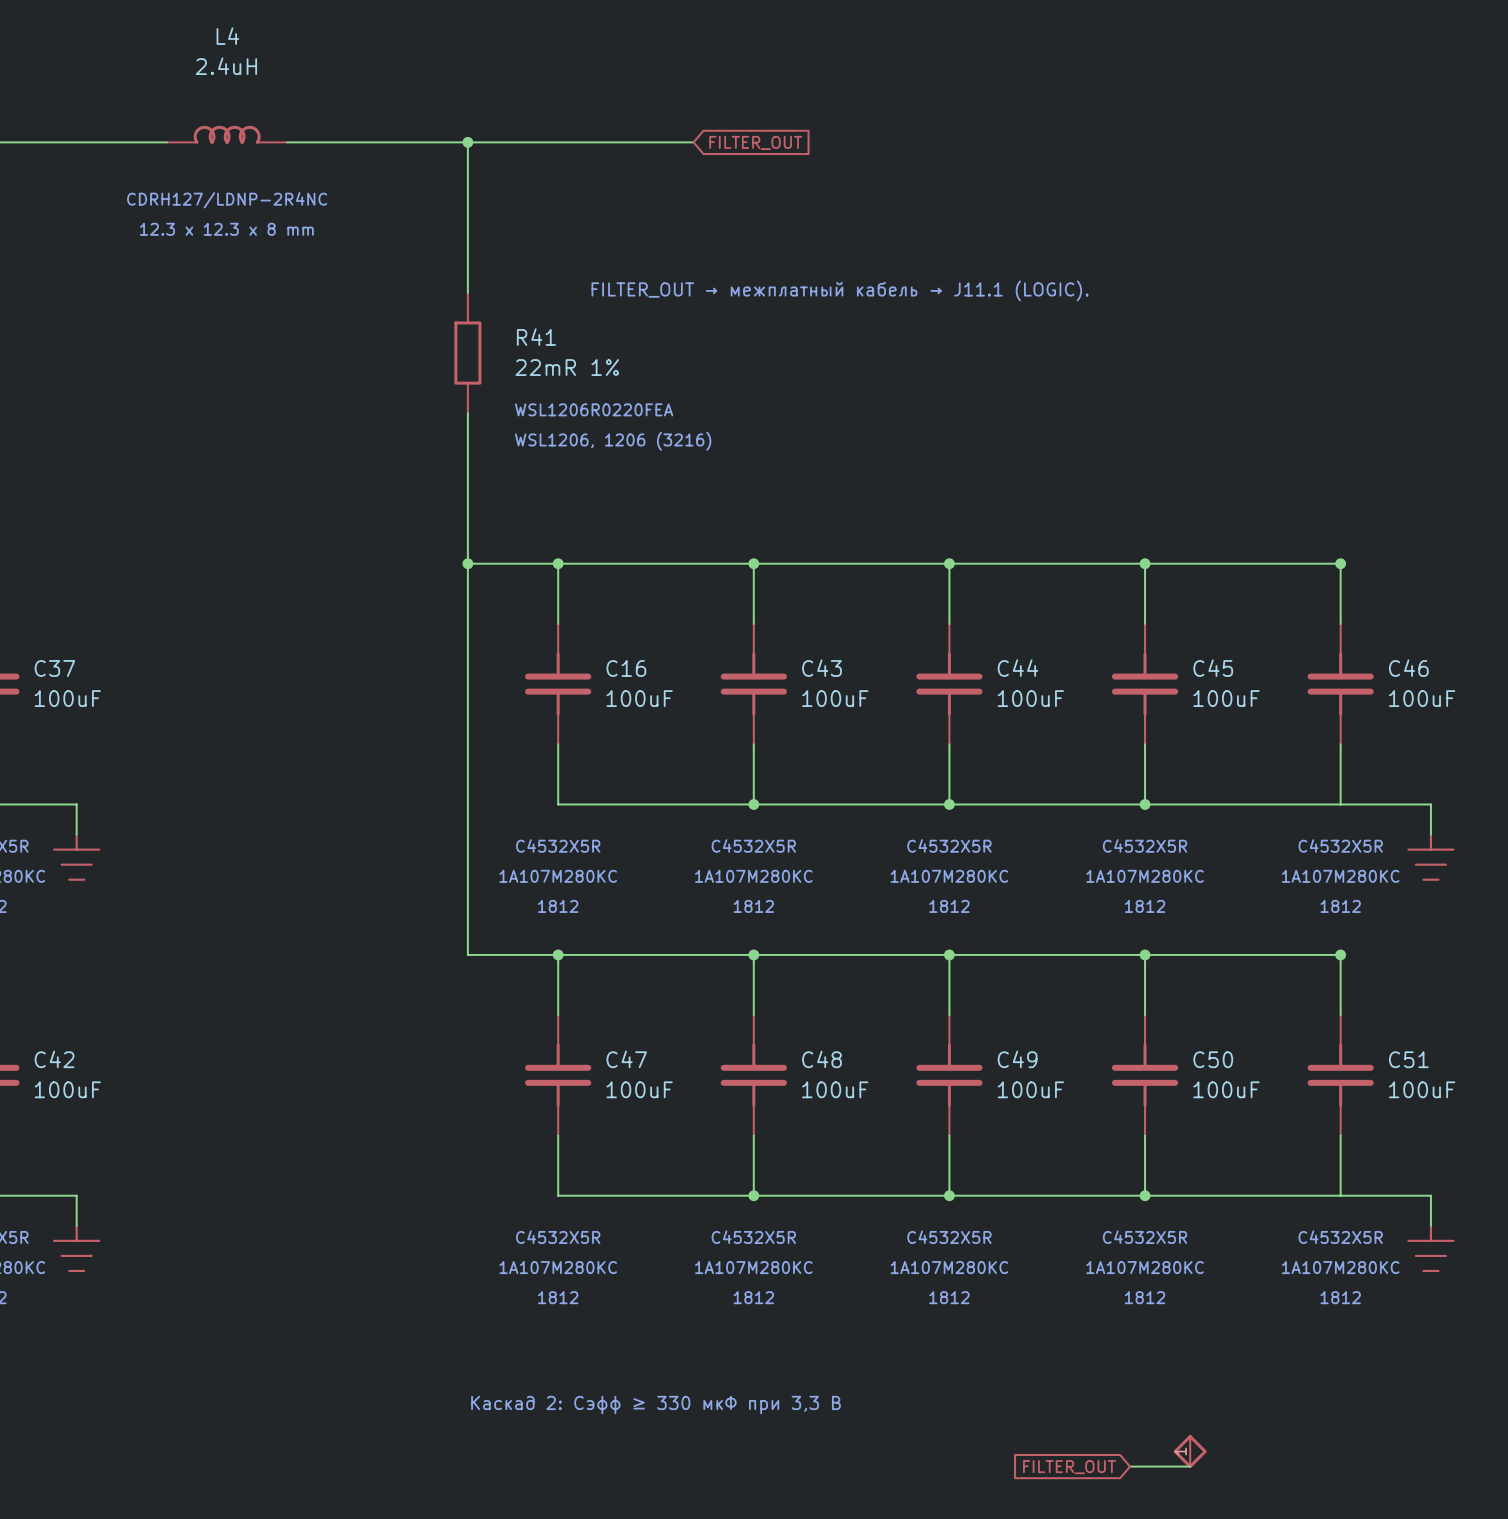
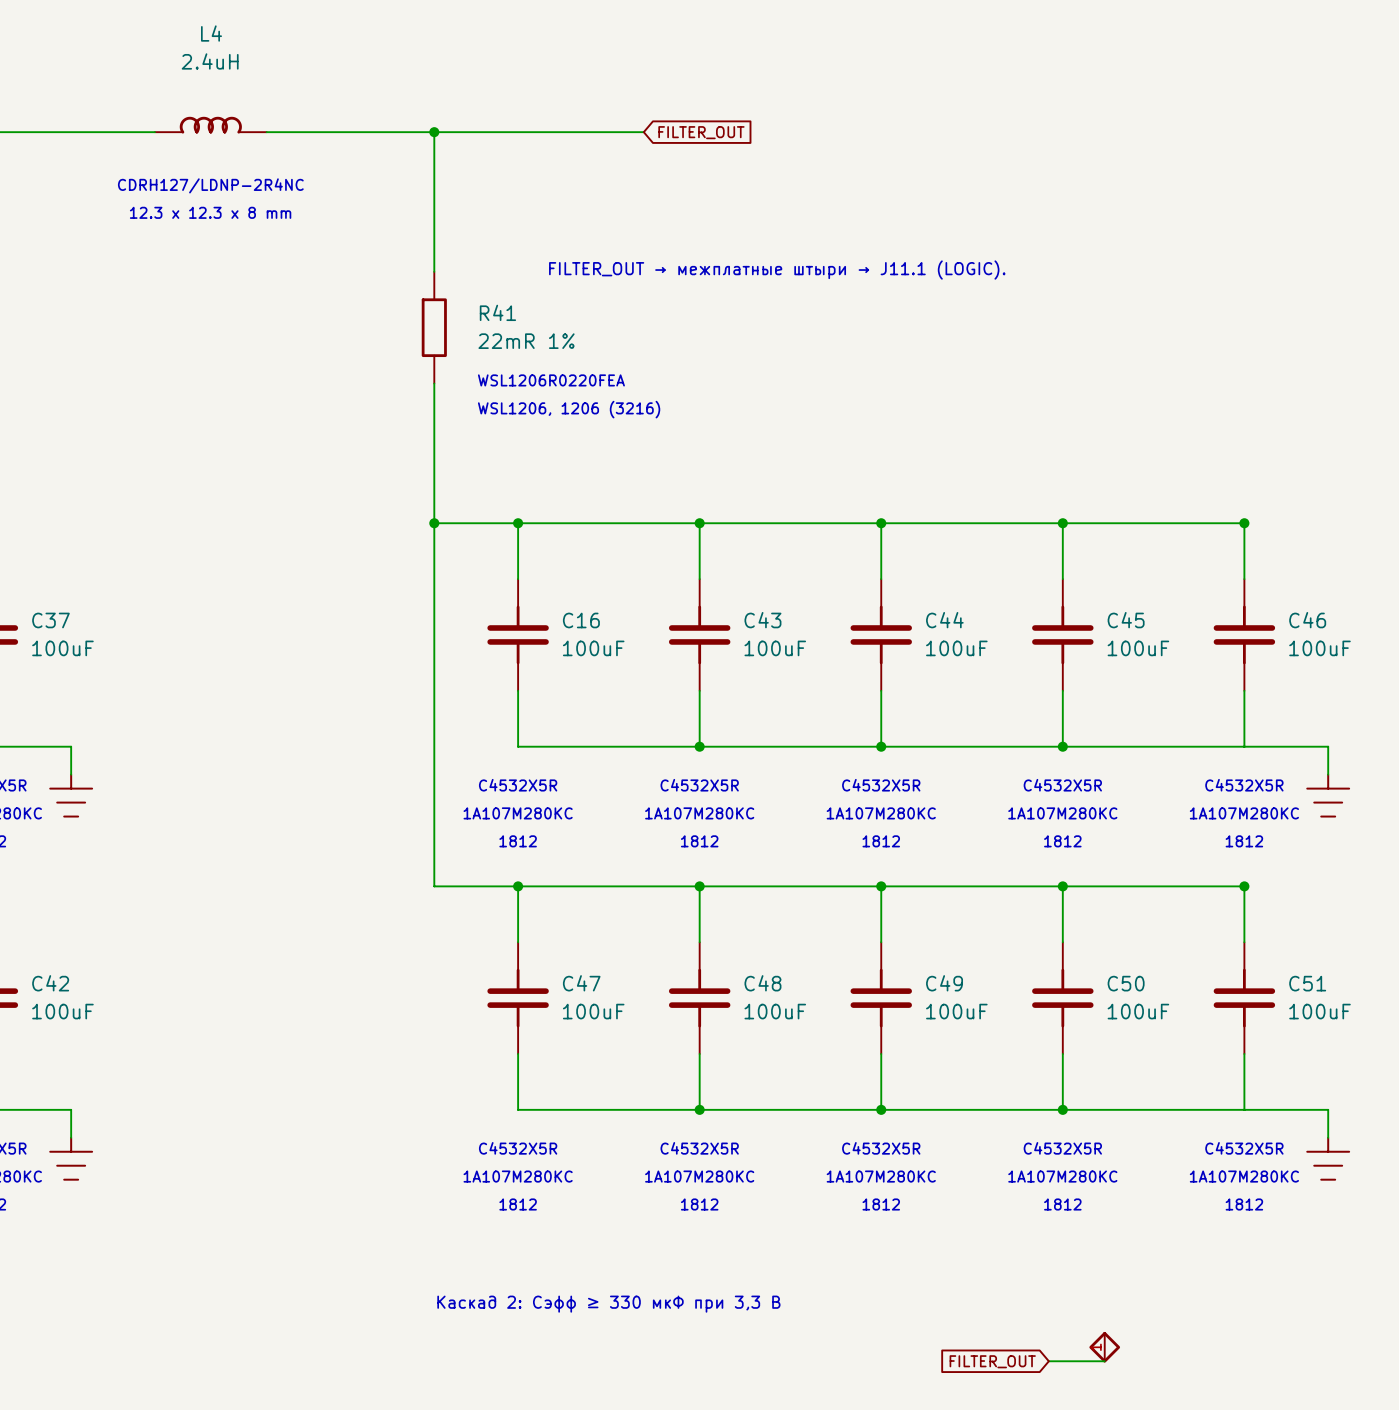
text: FILTER_OUT → межплатный кабель → J11.1 (LOGIC). (840, 290) -> FILTER_OUT → межплатные штыри → J11.1 (LOGIC). (777, 270)

